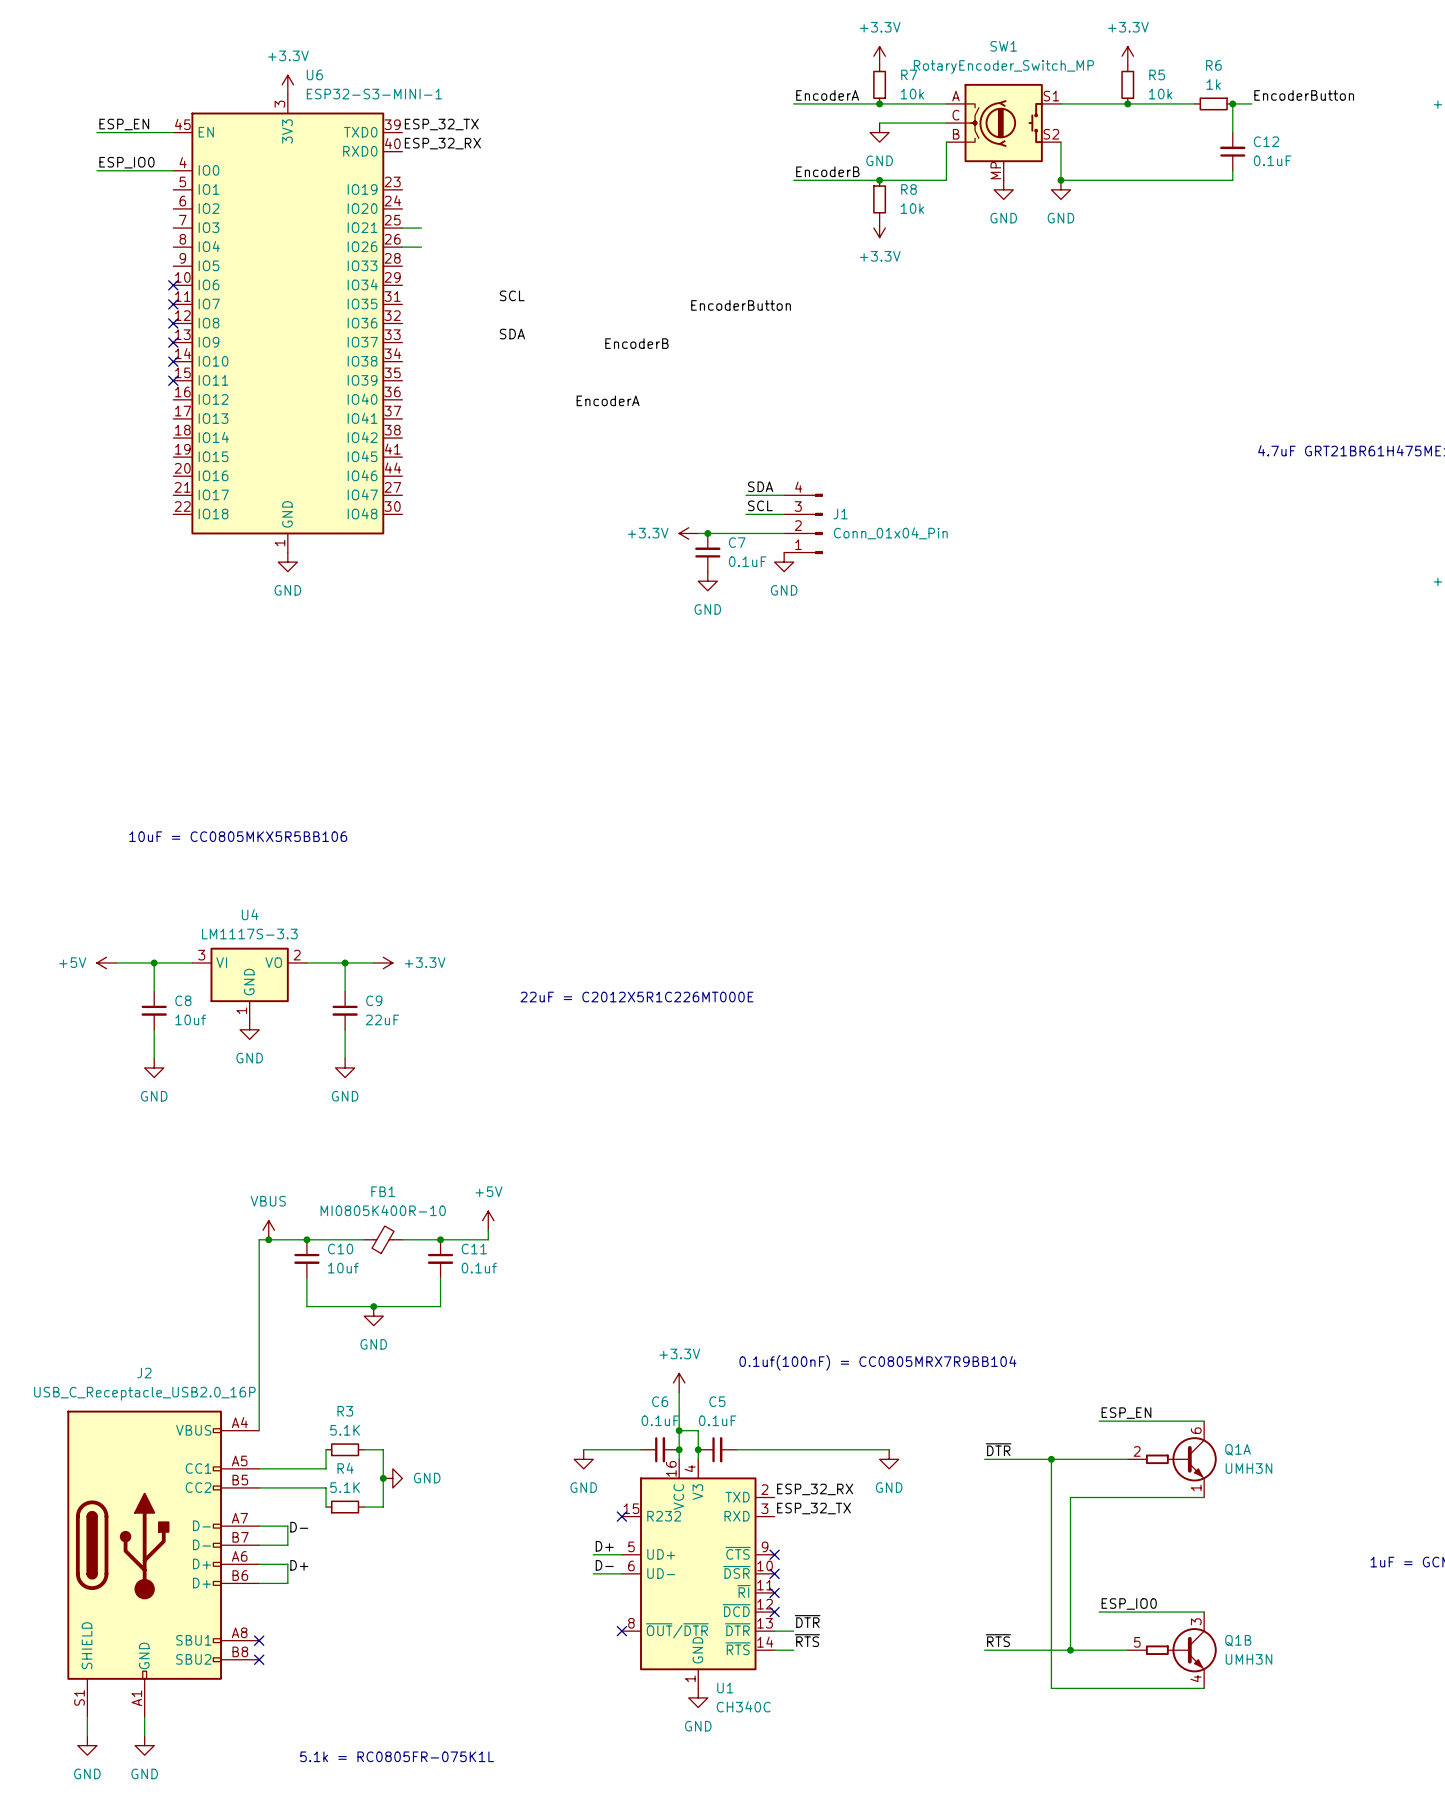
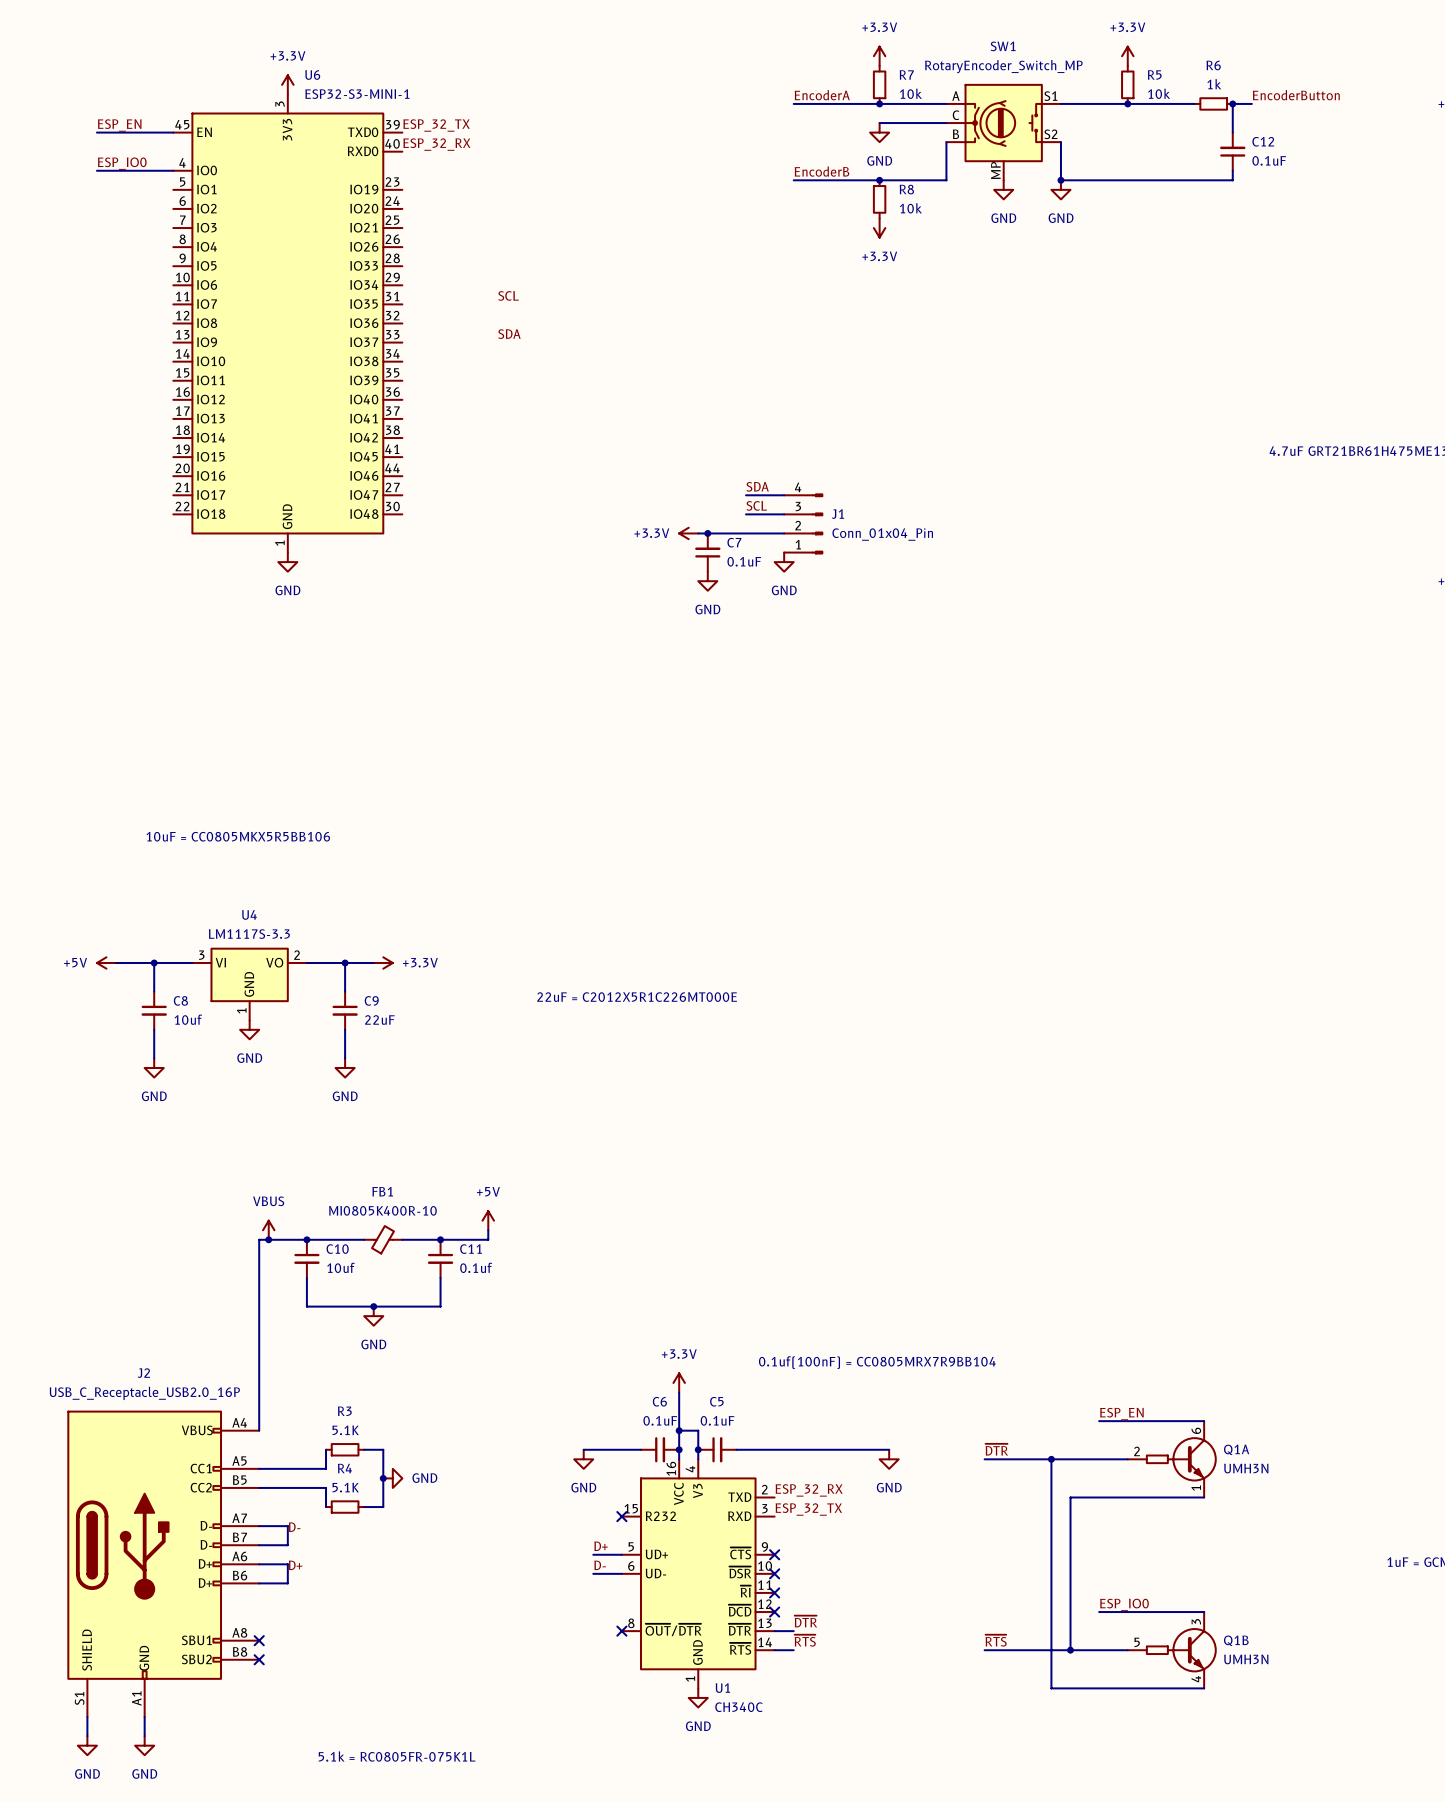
wire: (402, 228) (421, 228) -> none
wire: (402, 247) (421, 247) -> none
no-connect mark: (173, 285) -> none
no-connect mark: (173, 304) -> none
label: EncoderButton (741, 305) -> none
no-connect mark: (173, 323) -> none
no-connect mark: (173, 342) -> none
label: EncoderB (636, 343) -> none
no-connect mark: (173, 361) -> none
no-connect mark: (173, 380) -> none
label: EncoderA (608, 400) -> none

